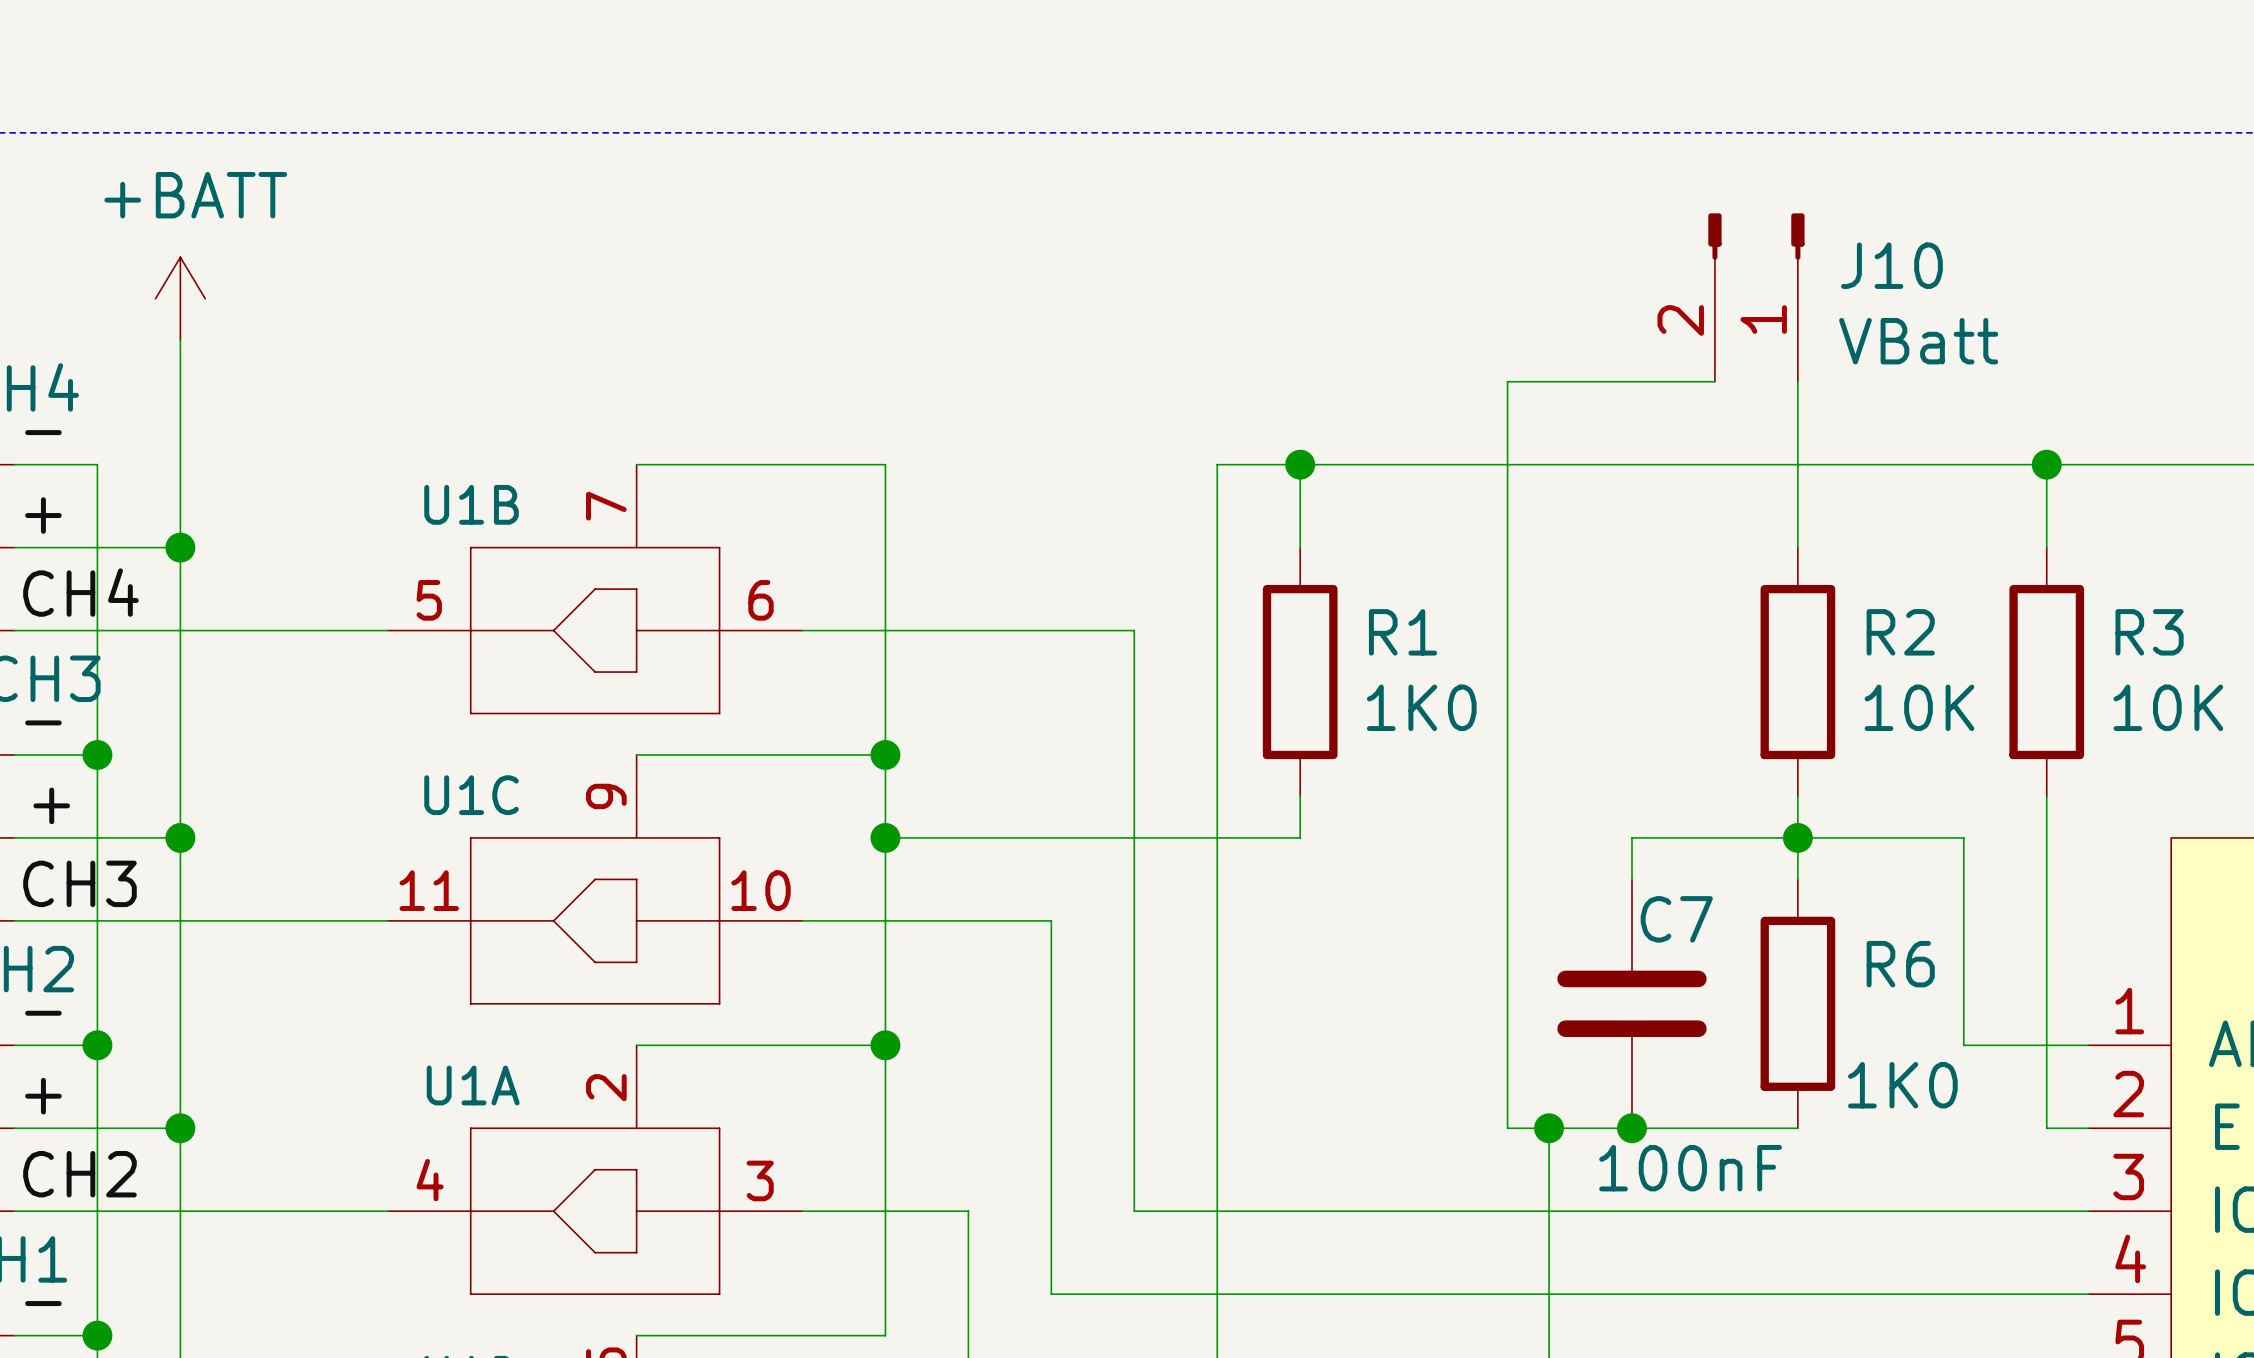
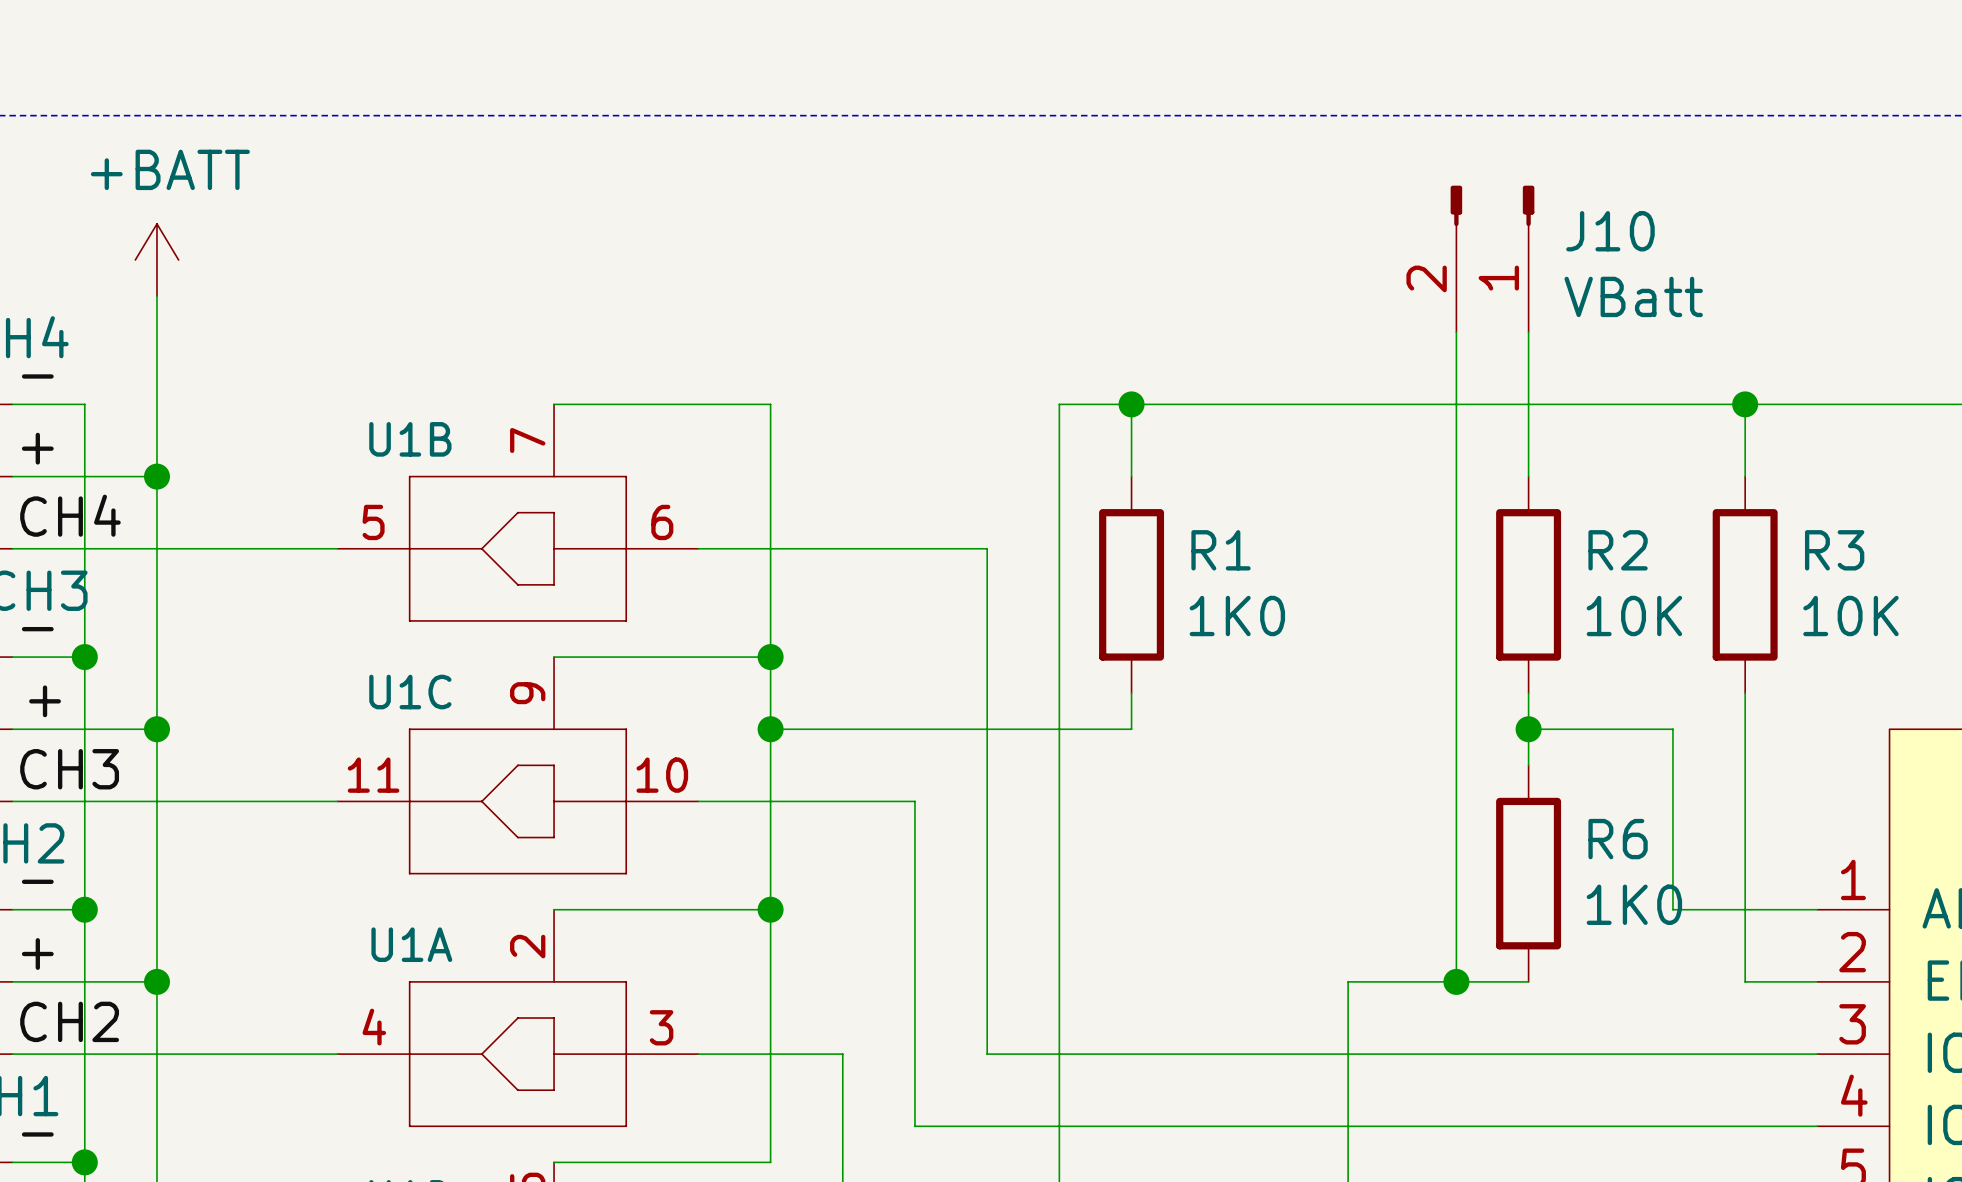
J10 position: (1756, 297) -> (1492, 258)
wire: none -> (1456, 332) (1456, 981)
wire: (1714, 381) (1507, 381) (1507, 1128) (1549, 1128) -> none
wire: (1797, 381) (1797, 547) -> (1528, 332) (1528, 476)
wire: (2046, 464) (2046, 547) -> (1745, 404) (1745, 476)
junction position: (2046, 464) -> (1745, 404)
R2 position: (1797, 672) -> (1528, 584)
R3 position: (2046, 672) -> (1745, 584)
wire: (1797, 796) (1797, 879) -> (1528, 693) (1528, 765)
wire: (2046, 796) (2046, 1128) -> (1745, 693) (1745, 981) (1781, 981)
wire: (1756, 837) (1631, 837) (1631, 879) -> none
junction position: (1797, 837) -> (1528, 729)
wire: (1922, 837) (1963, 837) (1963, 1045) -> (1672, 729) (1672, 909) (1709, 909)
C7: 100nF (1631, 1003) -> none
R6 position: (1797, 1003) -> (1528, 873)
R6 value position: 1K0 (1902, 1085) -> 1K0 (1634, 904)
junction: (1549, 1128) -> none
junction position: (1631, 1128) -> (1456, 981)
wire: (1756, 1128) (1797, 1128) -> none

